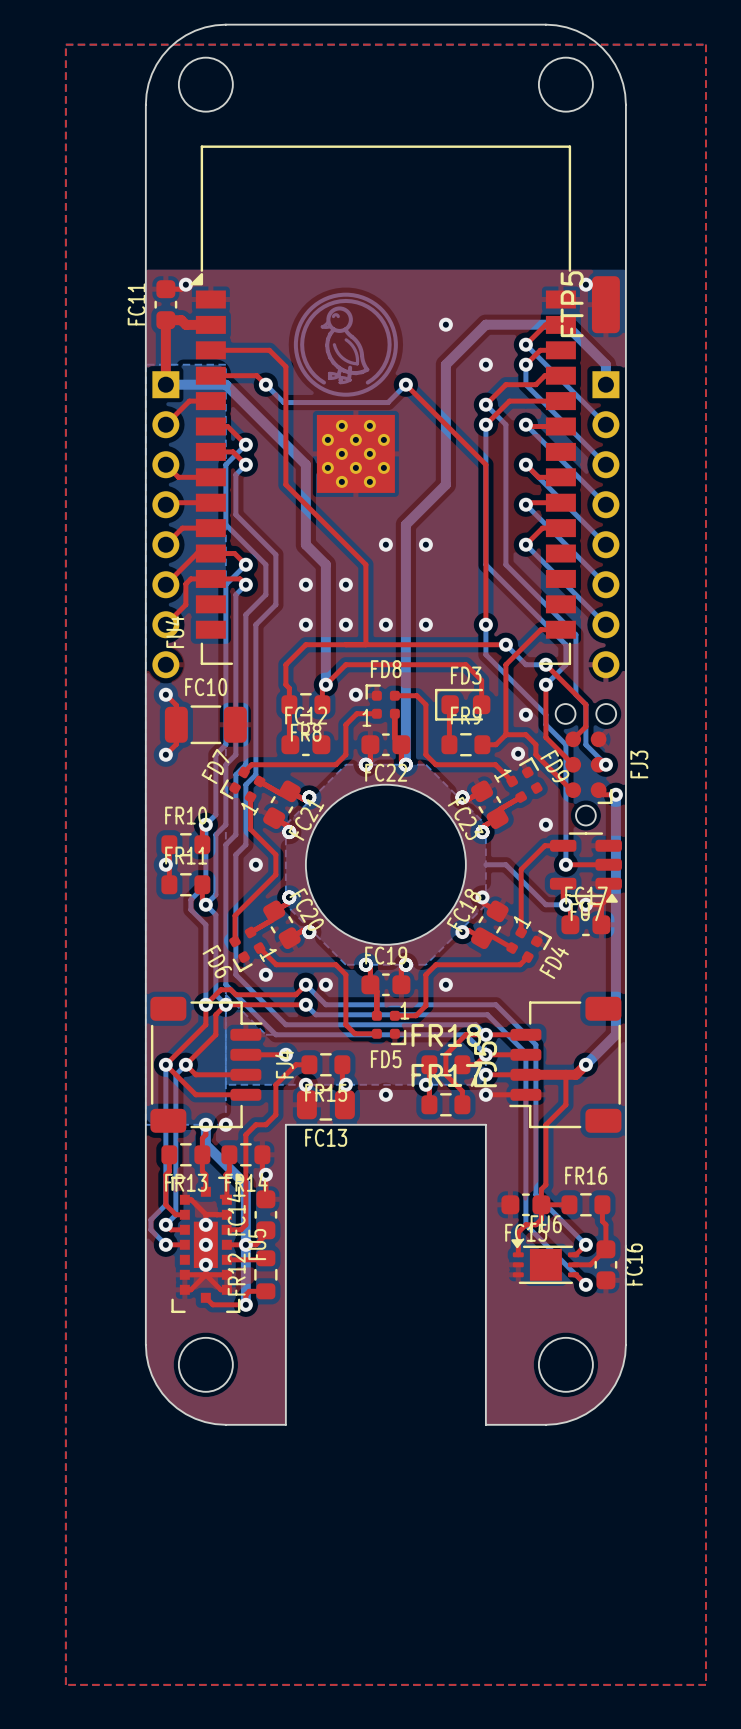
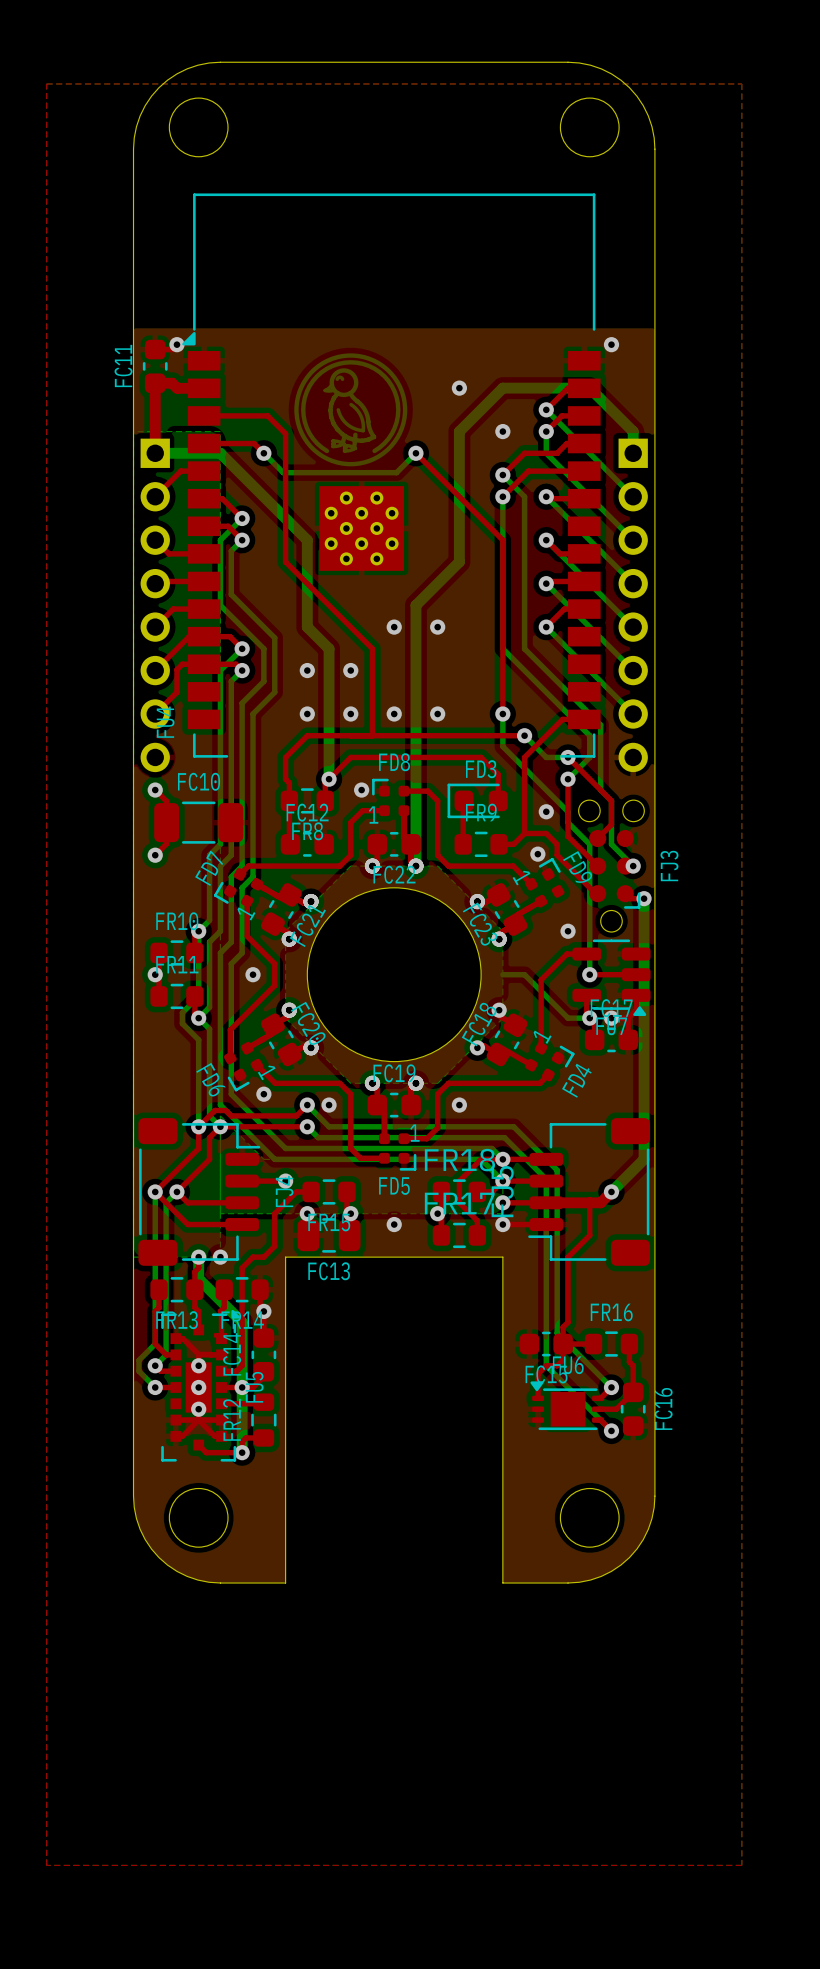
FTP5: (605, 304) -> none

